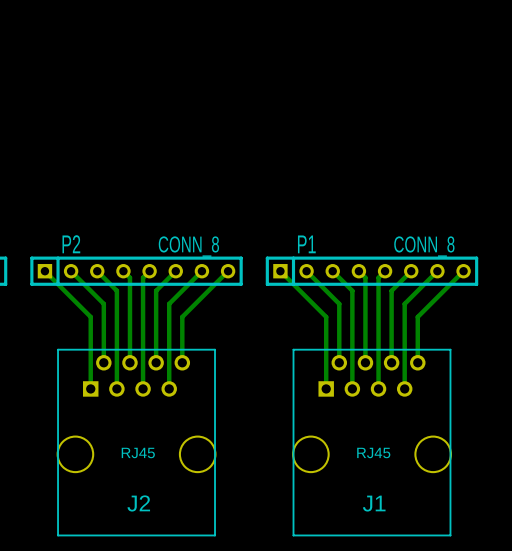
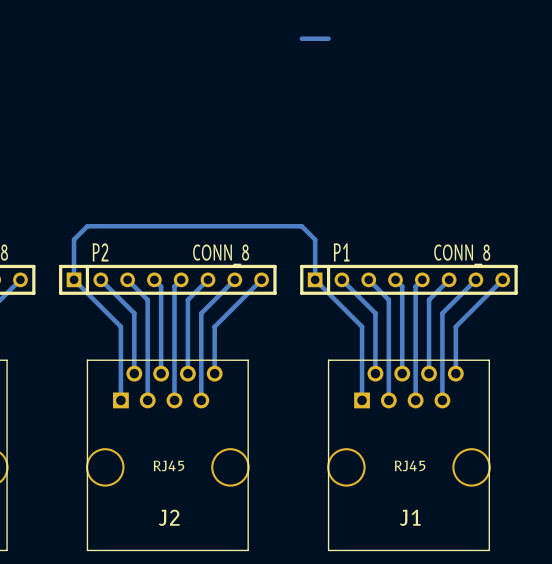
bottom track: none -> (301, 38) (328, 38)
bottom track: none -> (74, 279) (74, 239) (87, 226) (301, 226) (315, 239) (315, 279)

